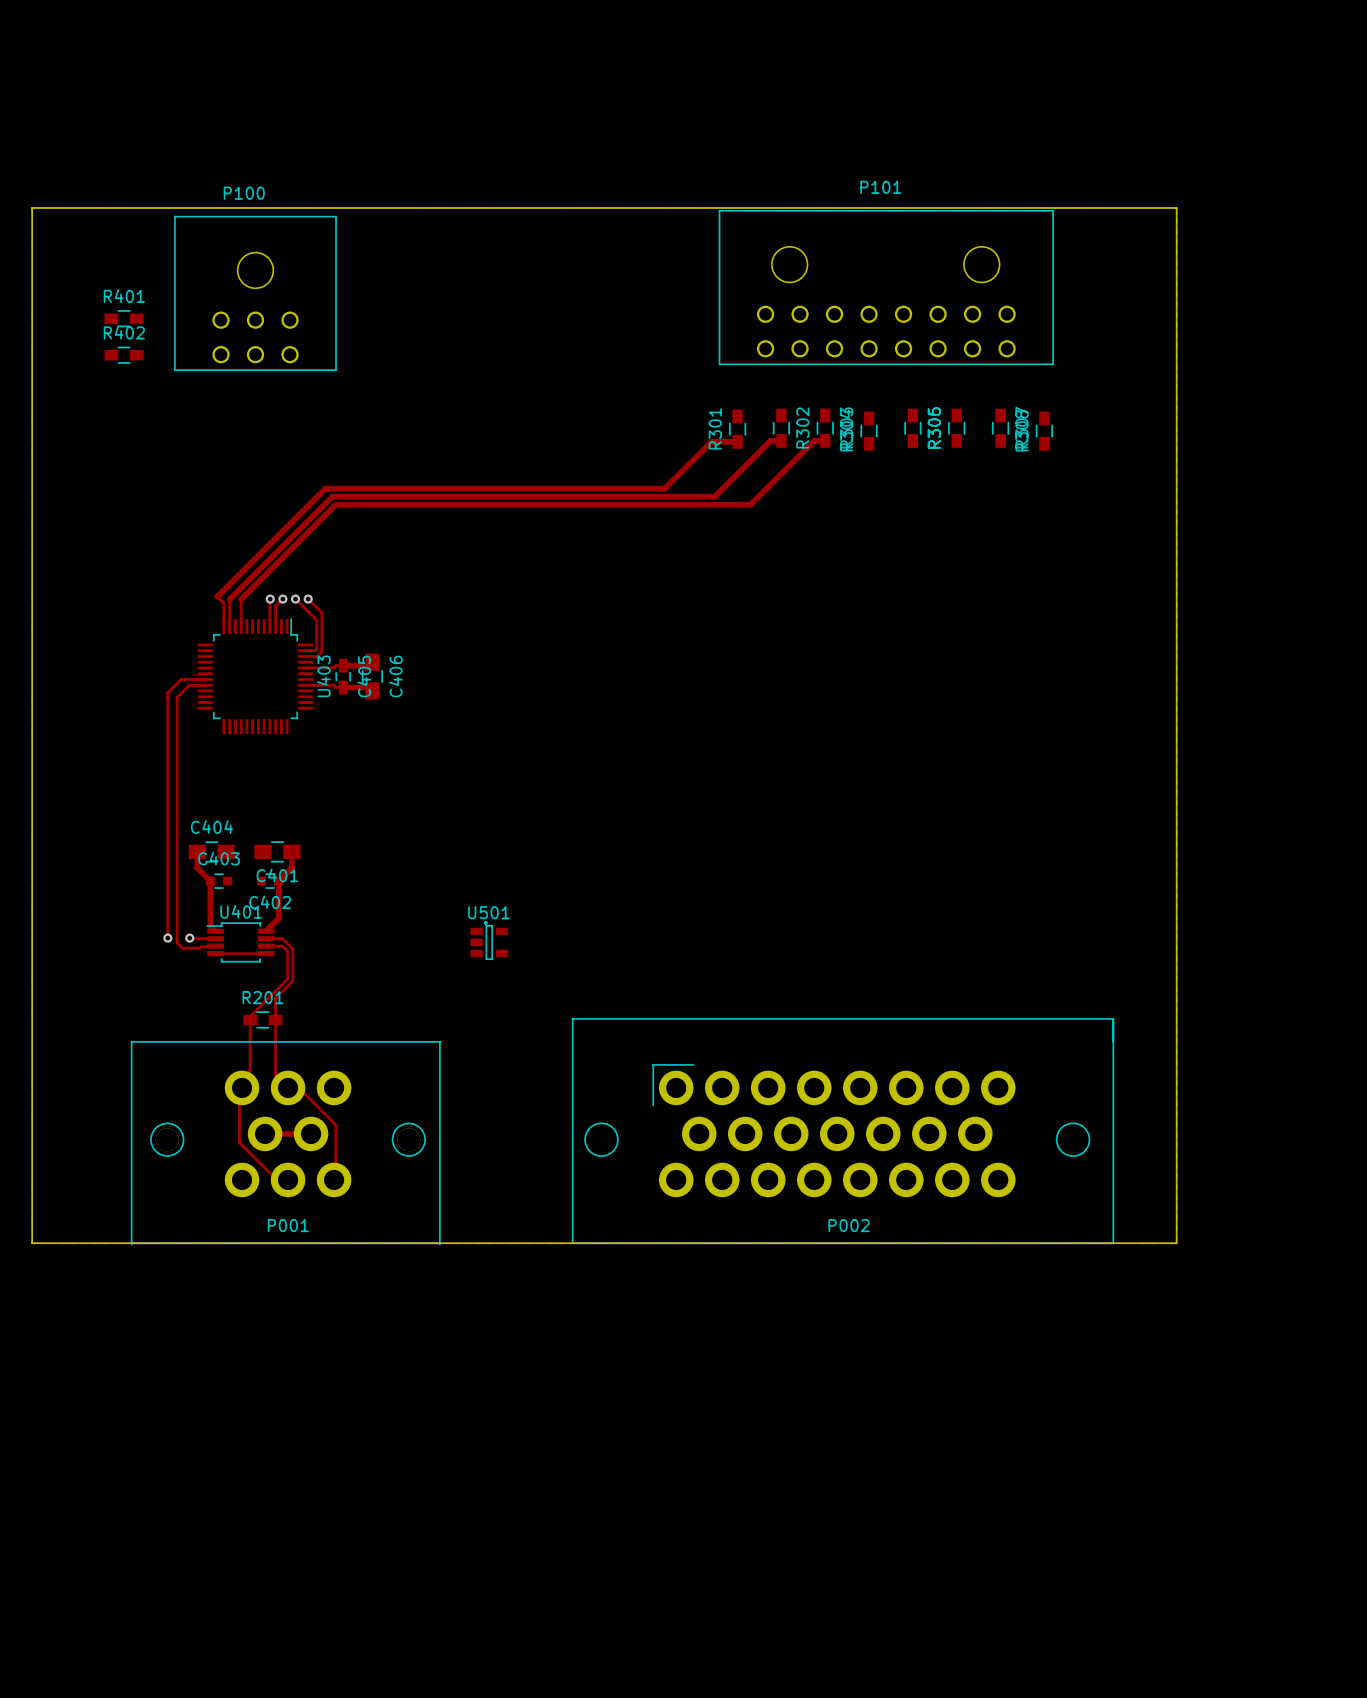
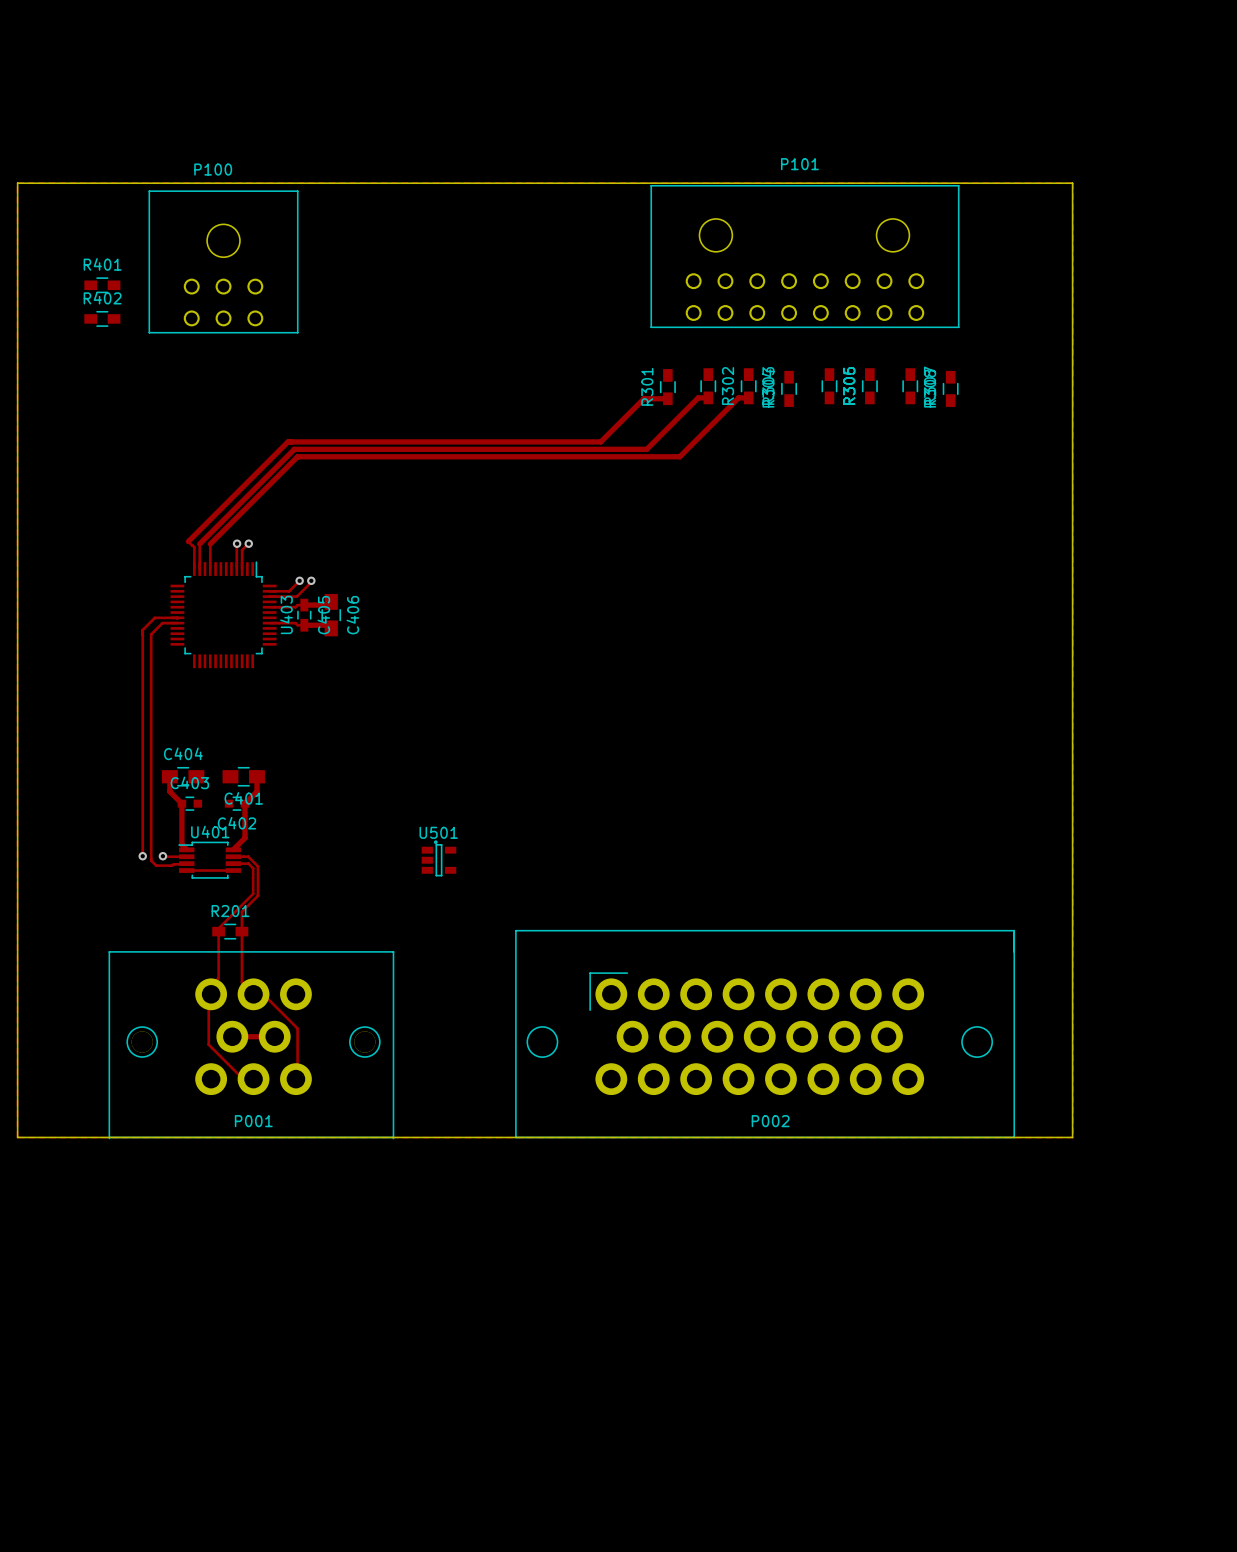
track: (295, 599) (316, 620) (315, 650) -> (299, 580) (289, 591) (279, 591)
via: (295, 599) -> none
track: (308, 599) (321, 612) (321, 652) (317, 656) -> (311, 580) (296, 596) (280, 596)
via: (308, 599) -> none
via: none -> (299, 580)
via: none -> (311, 580)

